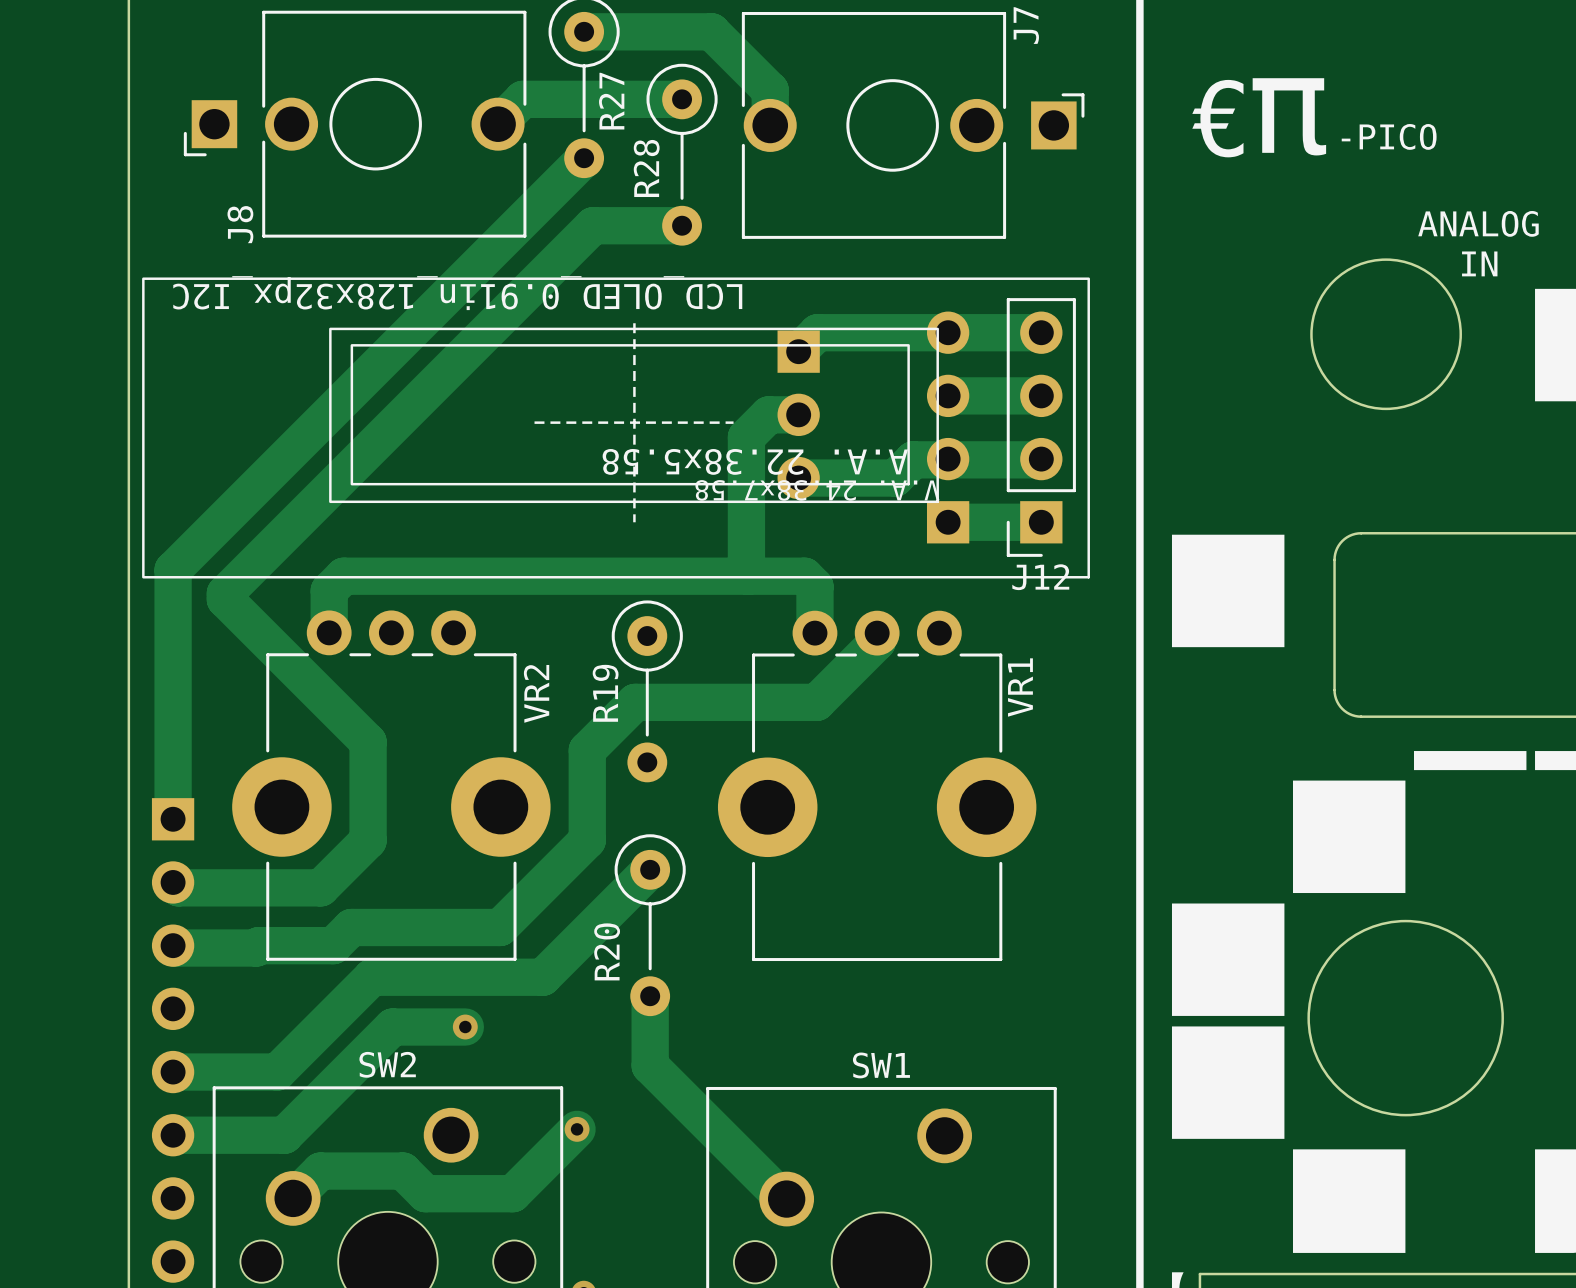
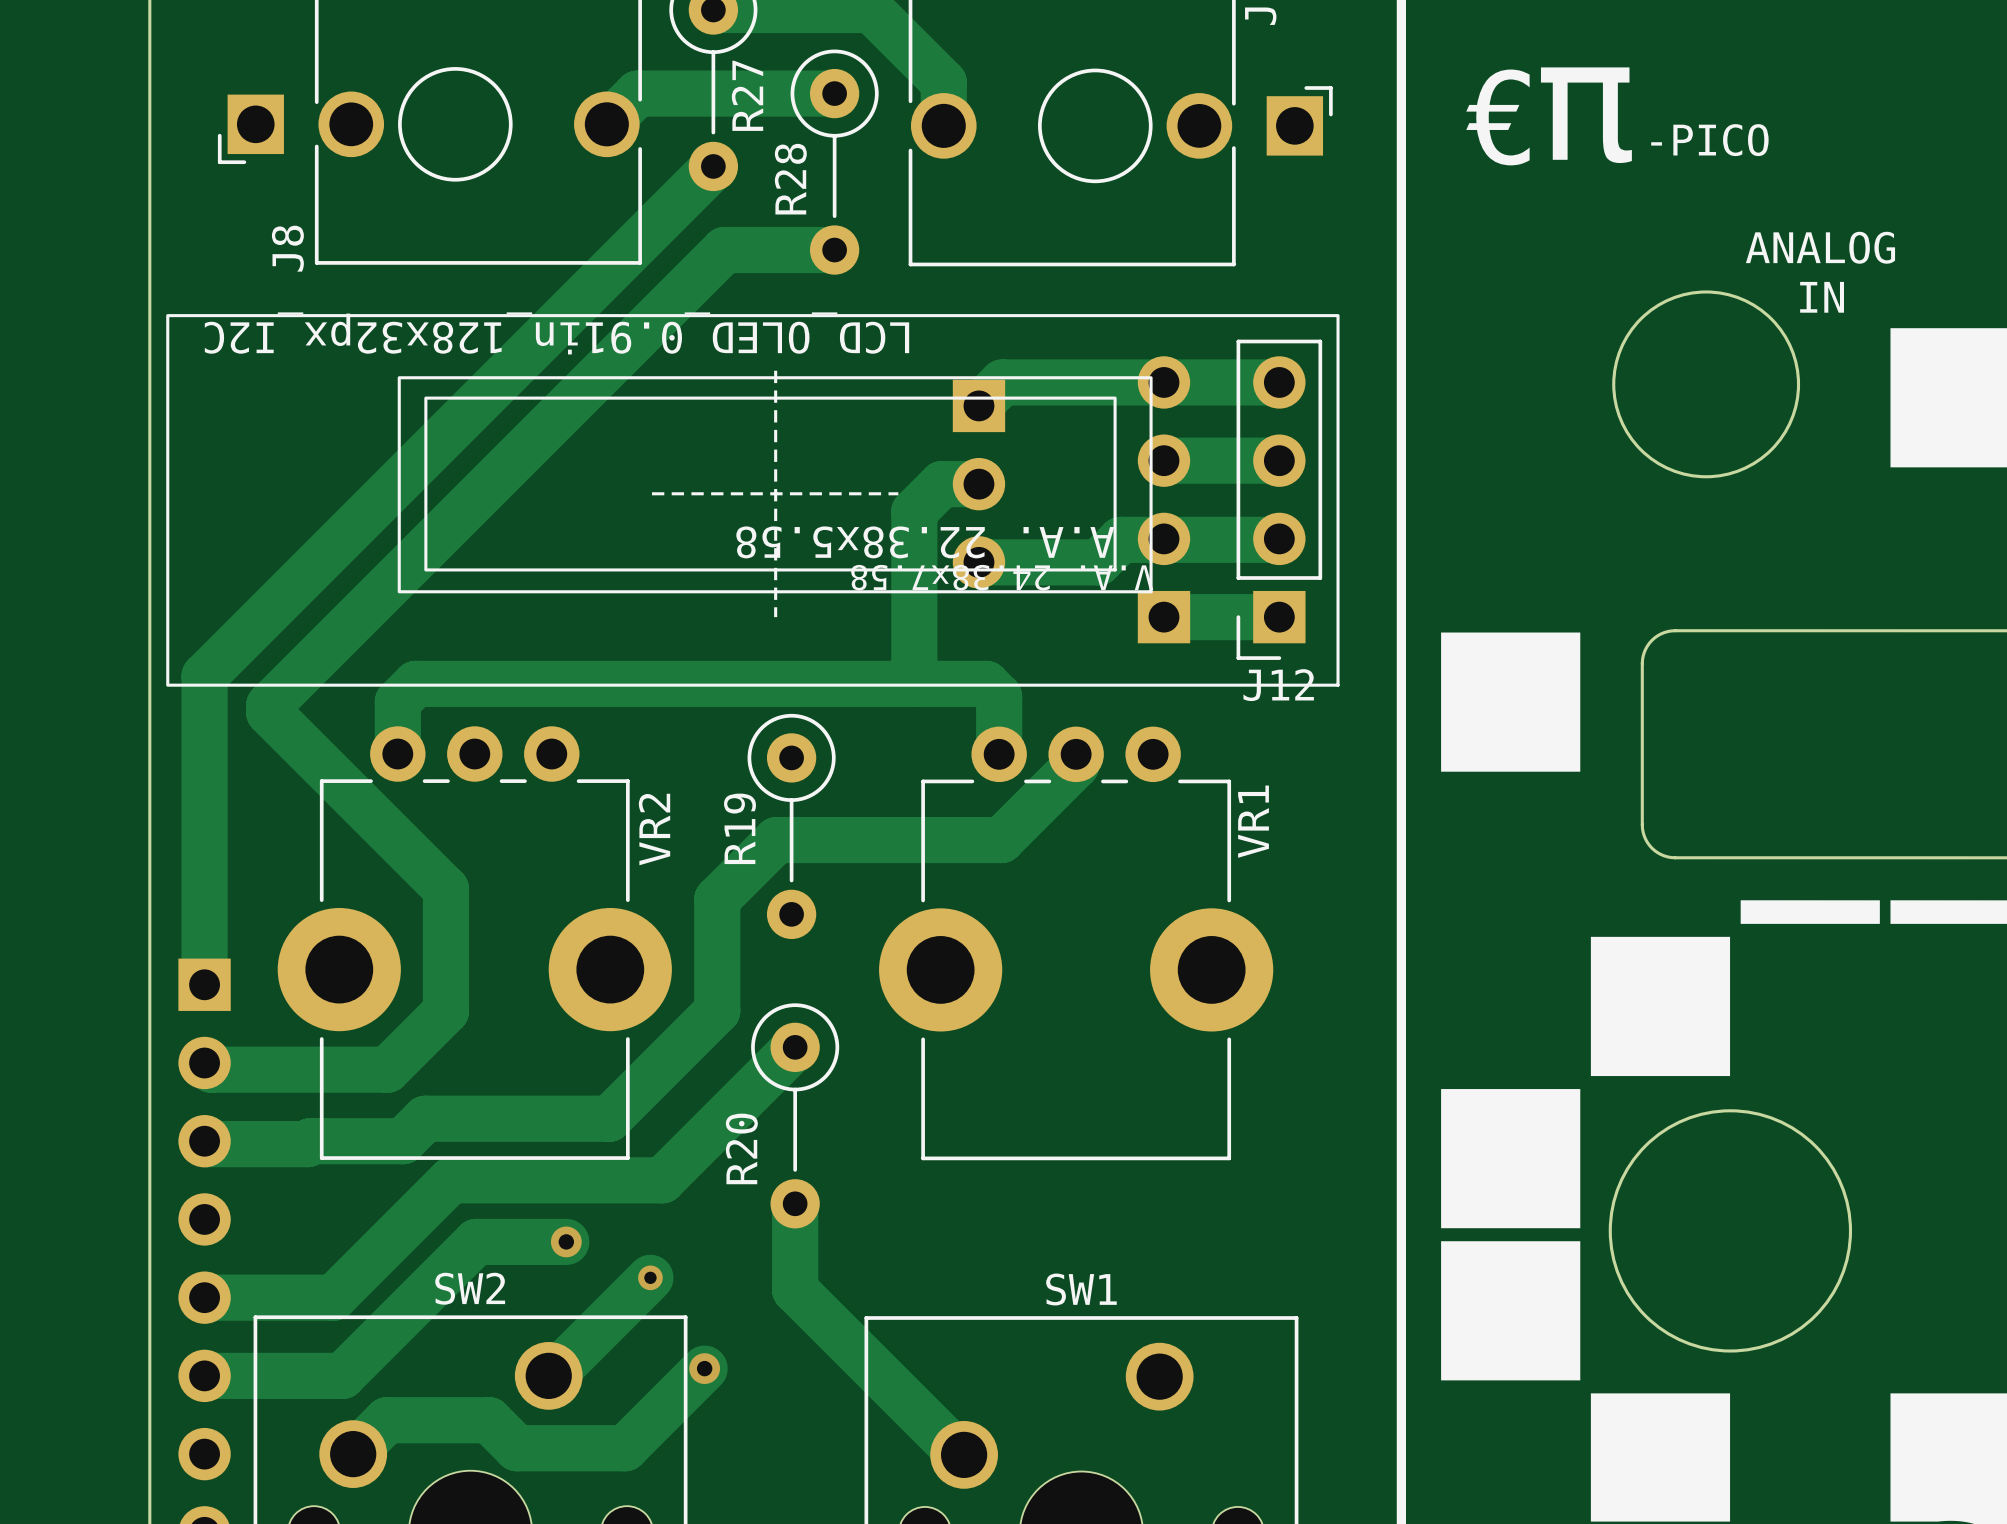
track: none -> (650, 1277) (552, 1375) (548, 1375)
via: none -> (650, 1277)

